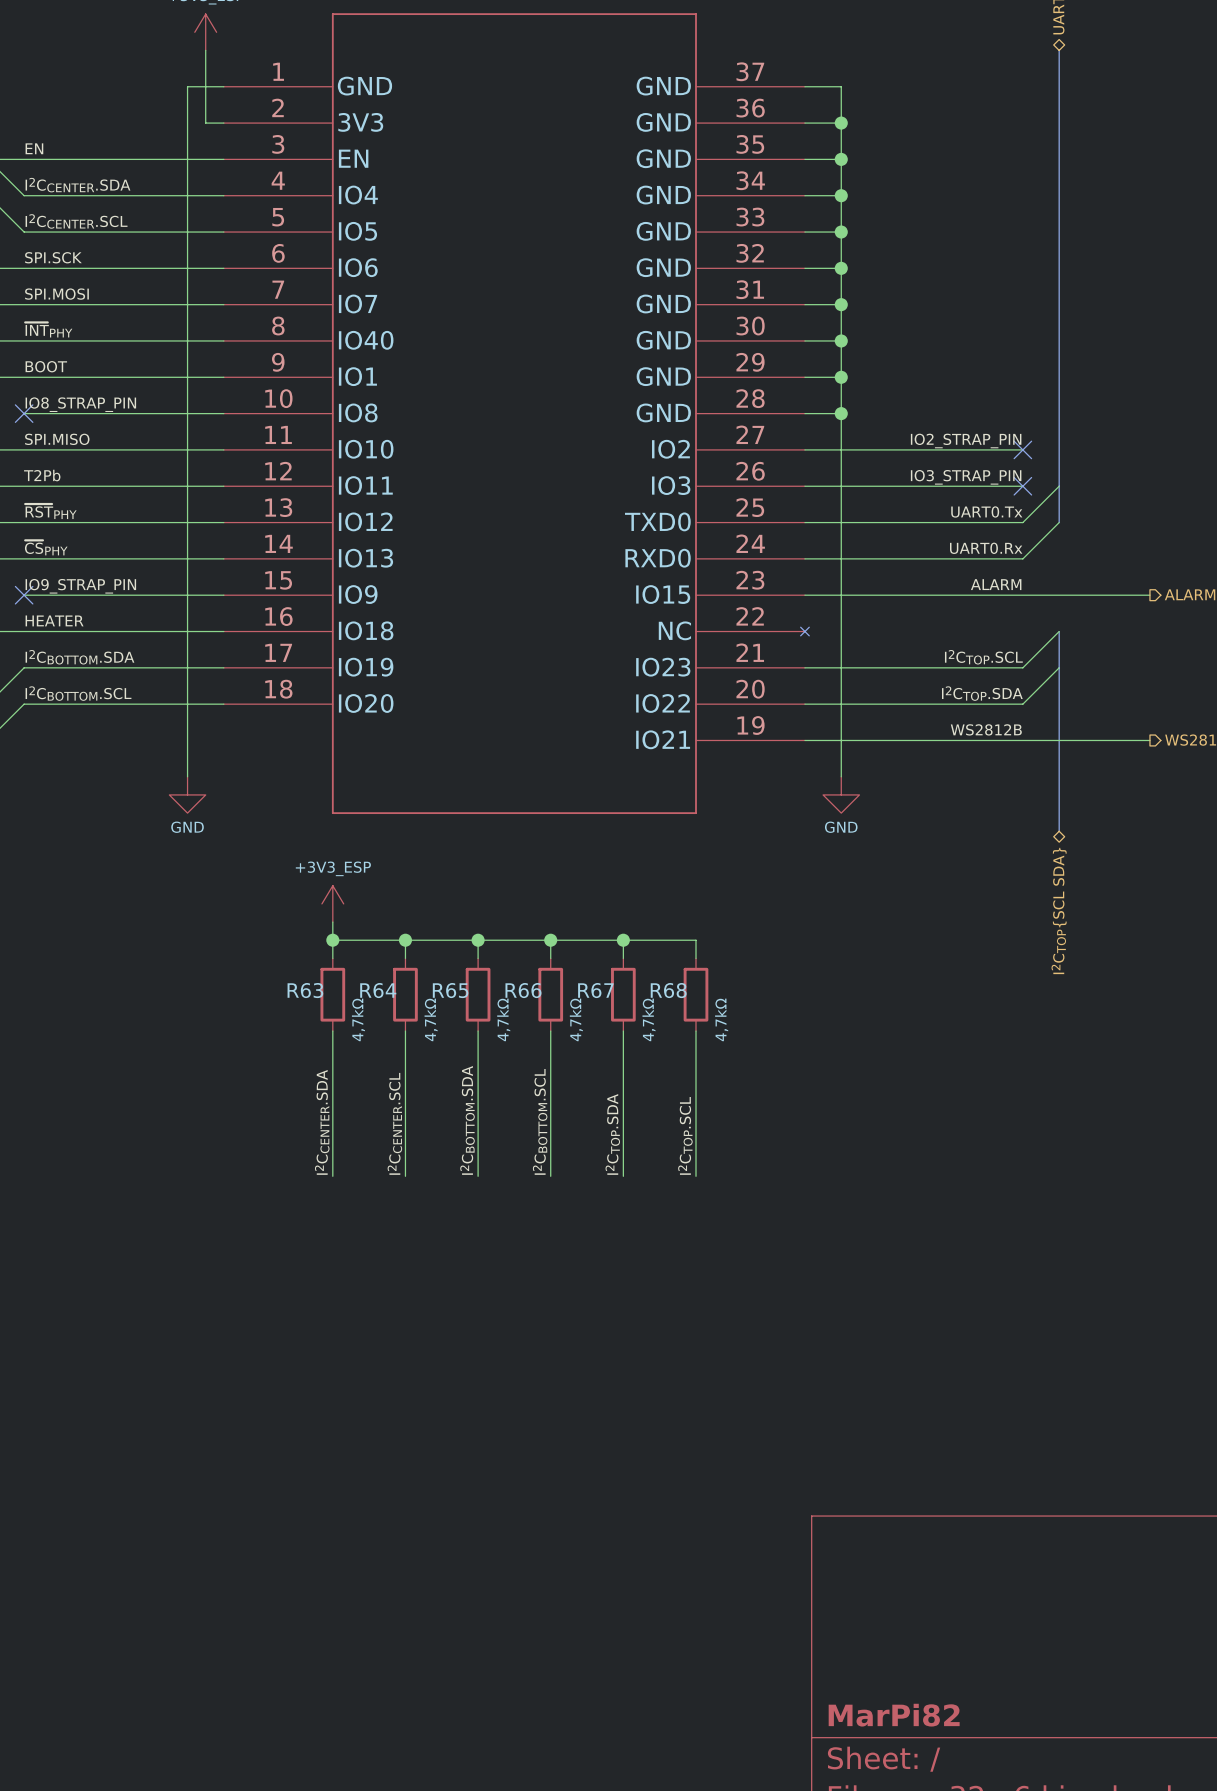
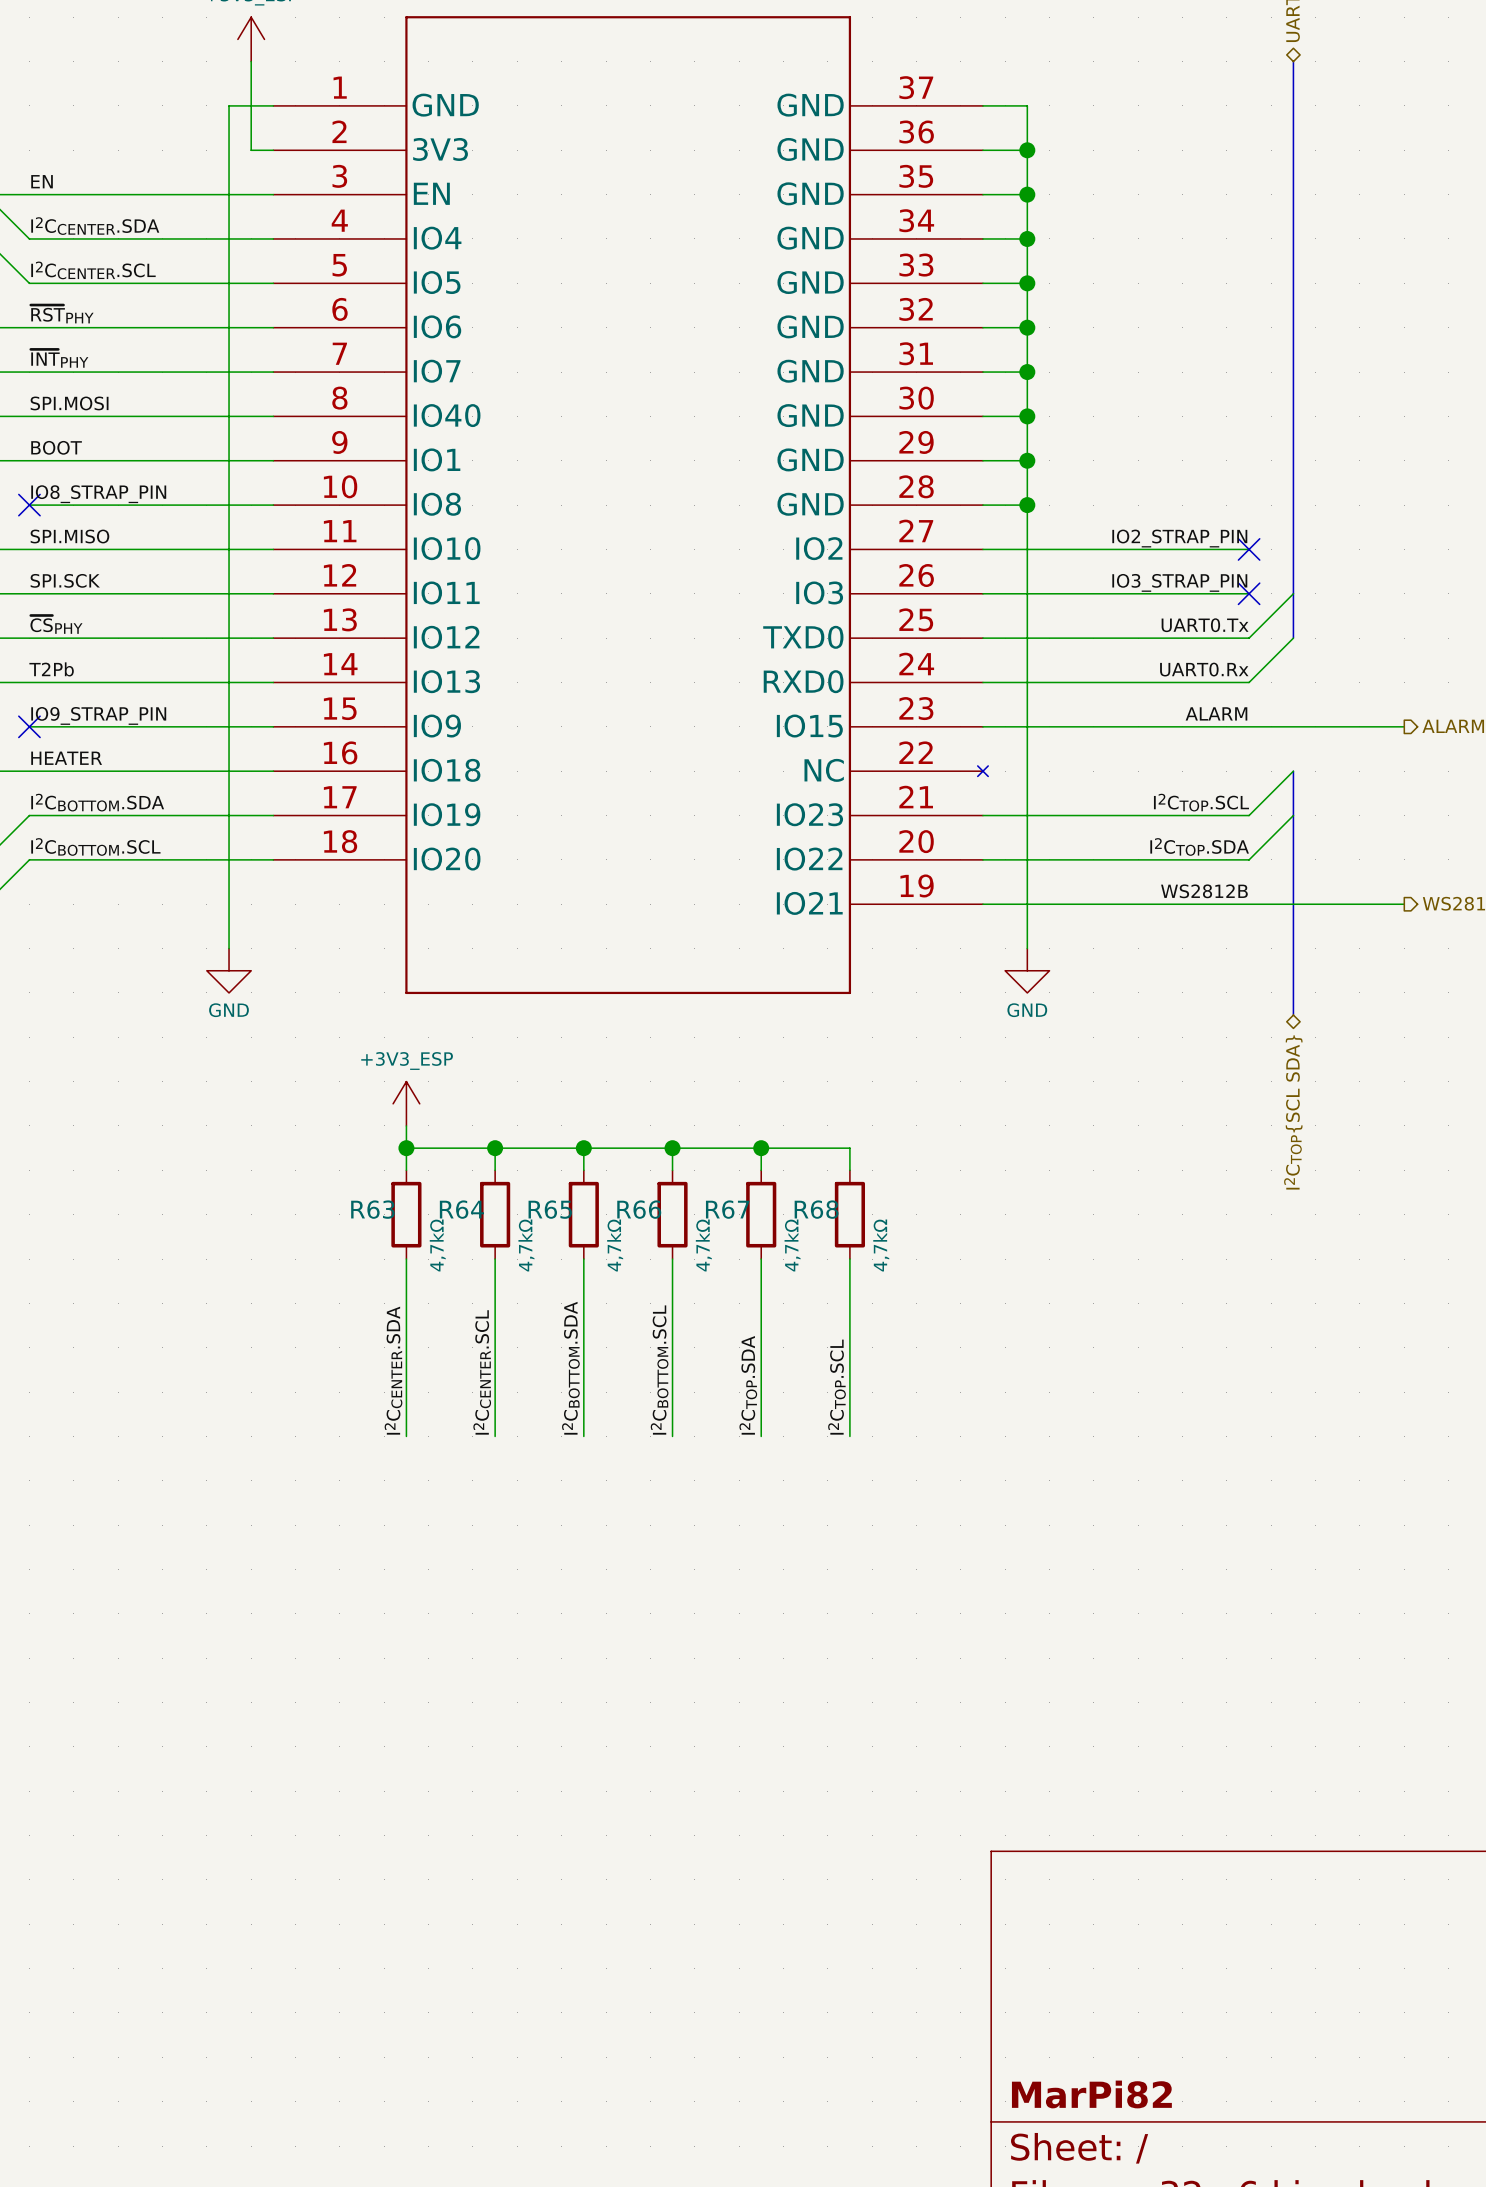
label: SPI.SCK (53, 257) -> ~{RST}PHY (62, 314)
label: SPI.MOSI (56, 294) -> ~{INT}PHY (59, 358)
label: ~{INT}PHY (48, 329) -> SPI.MOSI (69, 403)
label: T2Pb (42, 475) -> SPI.SCK (65, 580)
label: ~{RST}PHY (50, 511) -> ~{CS}PHY (56, 624)
label: ~{CS}PHY (46, 547) -> T2Pb (51, 669)

